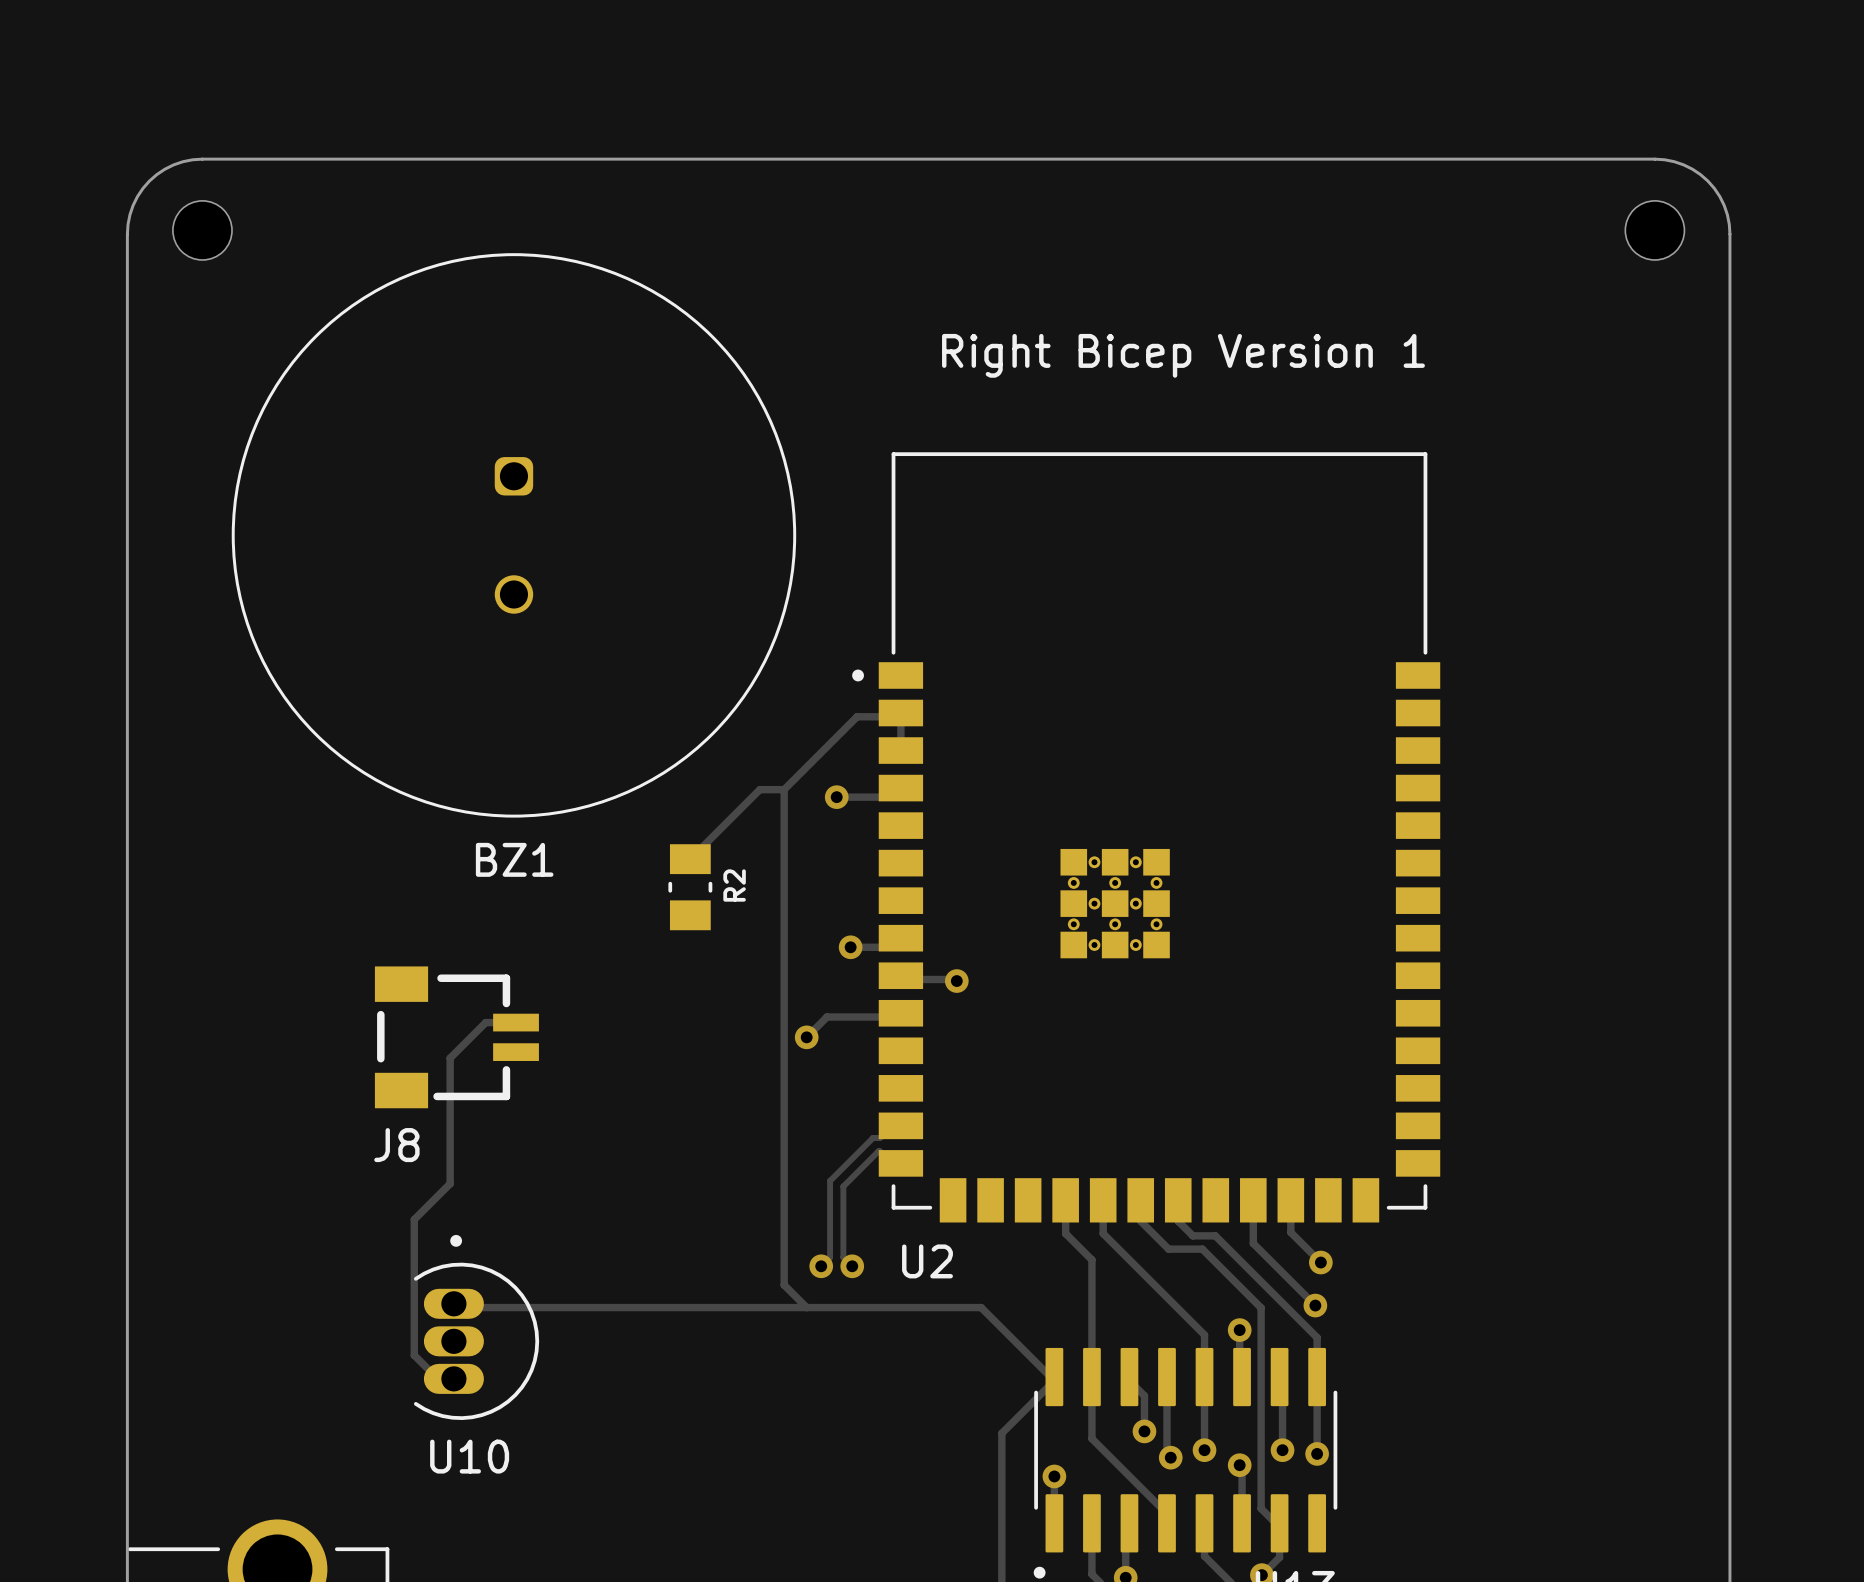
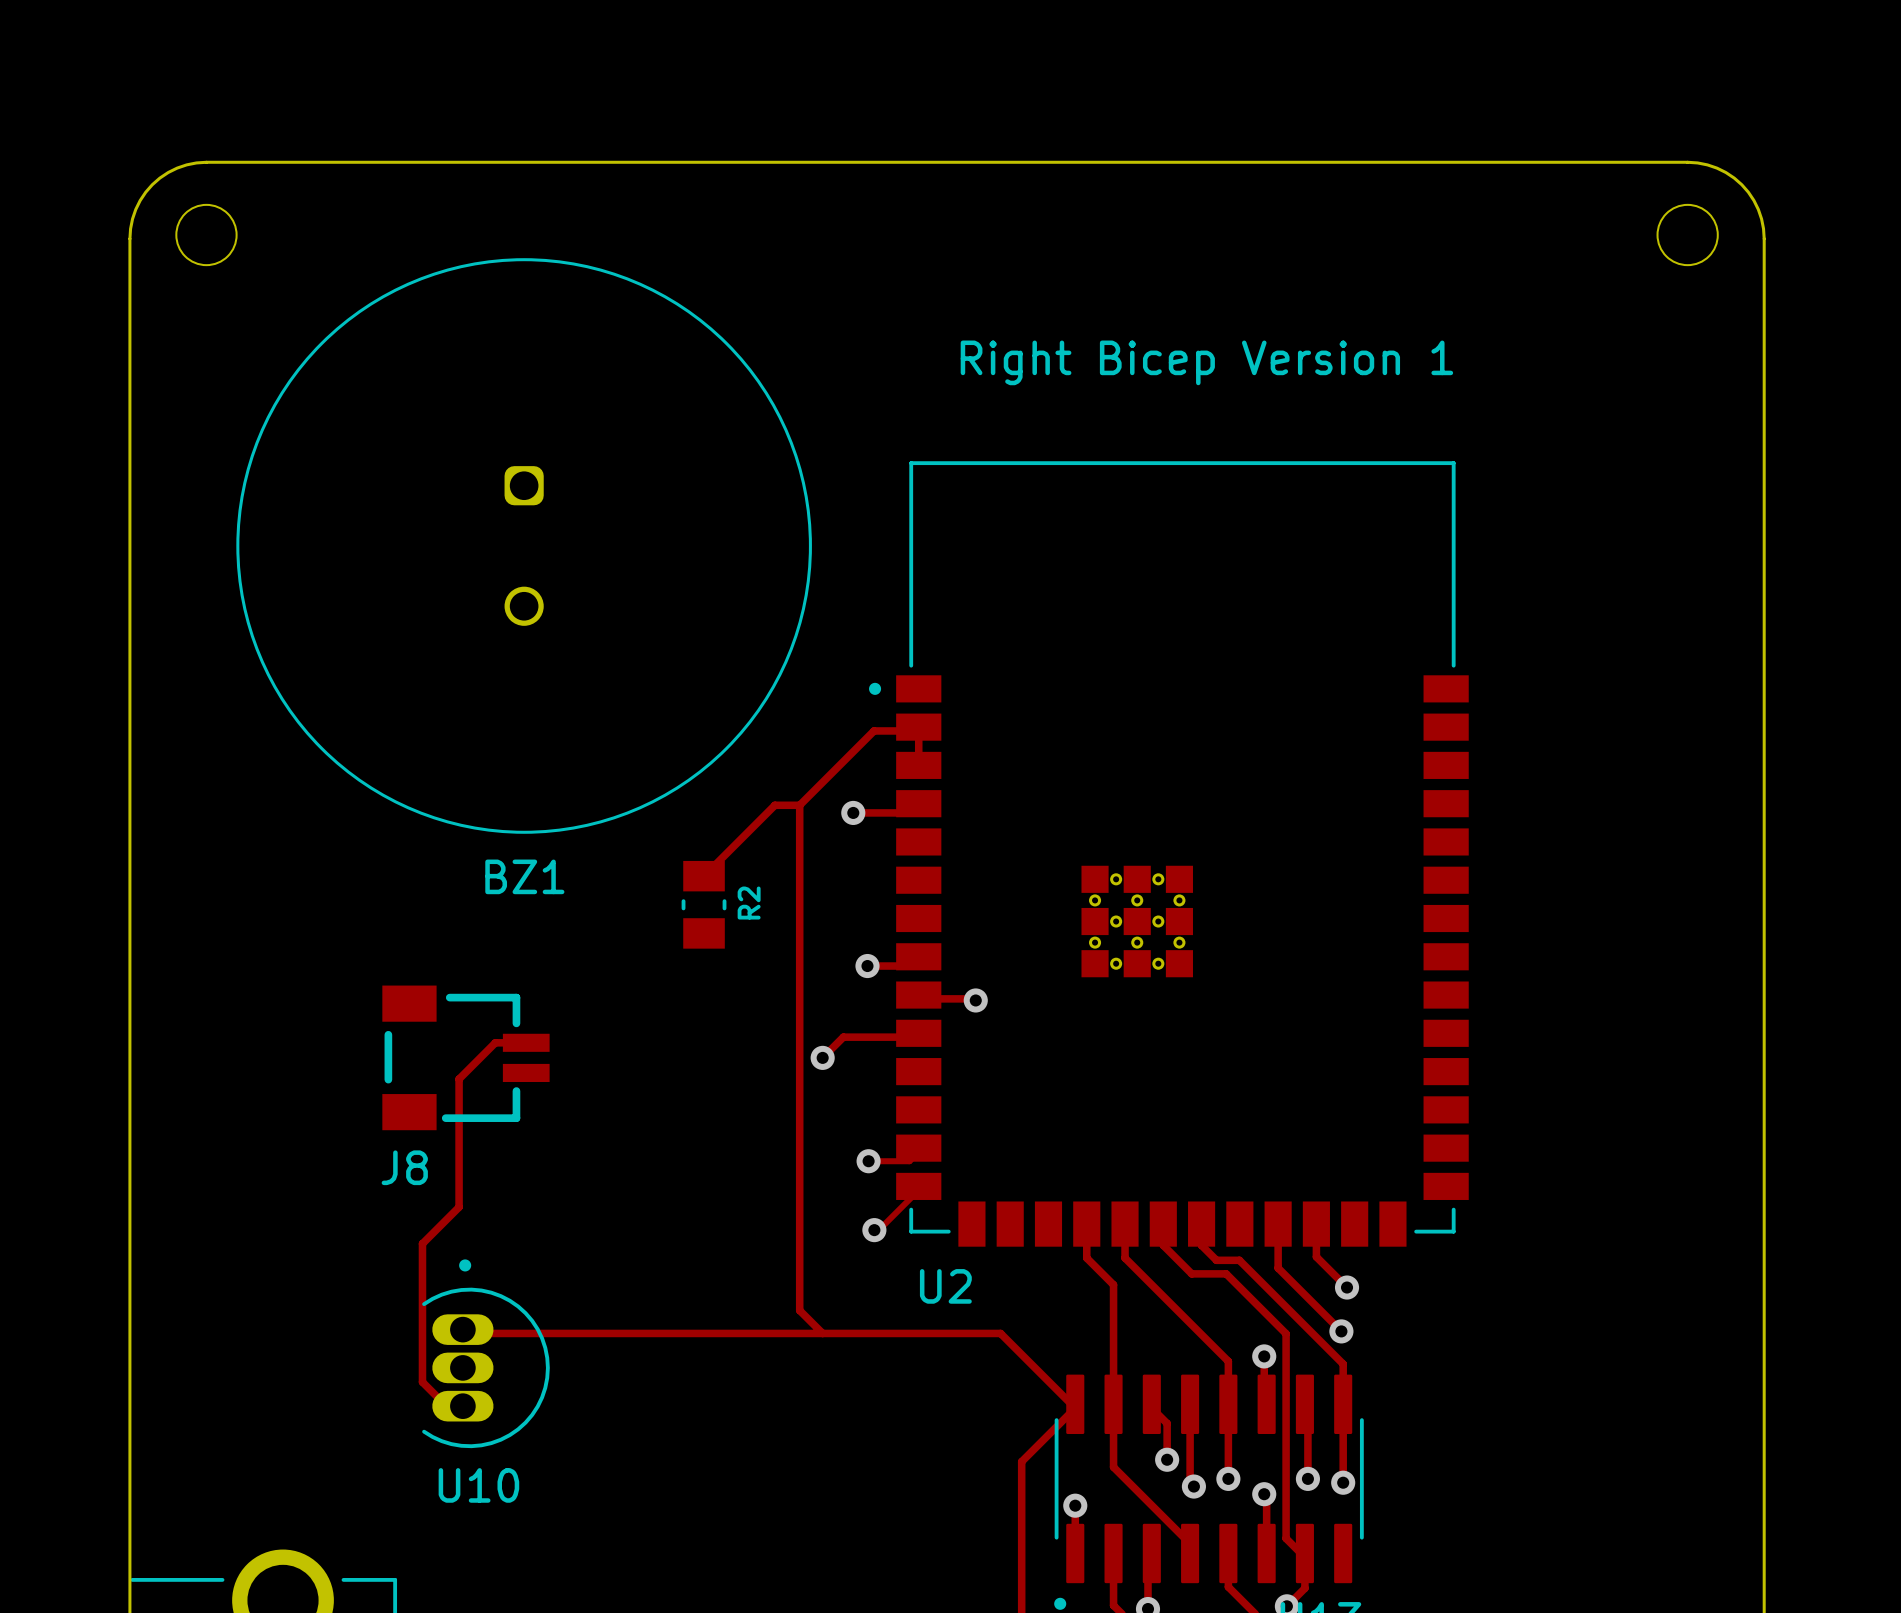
track: (900, 1125) (892, 1125) (879, 1137) (873, 1137) (830, 1180) (830, 1257) (821, 1266) -> none
track: none -> (918, 1151) (909, 1161) (868, 1161)
via: none -> (868, 1161)
track: (900, 1163) (892, 1163) (878, 1151) (843, 1186) (843, 1257) (852, 1266) -> none
track: none -> (918, 1190) (878, 1230) (874, 1230)
via: none -> (874, 1230)
via: (821, 1266) -> none
via: (852, 1266) -> none

